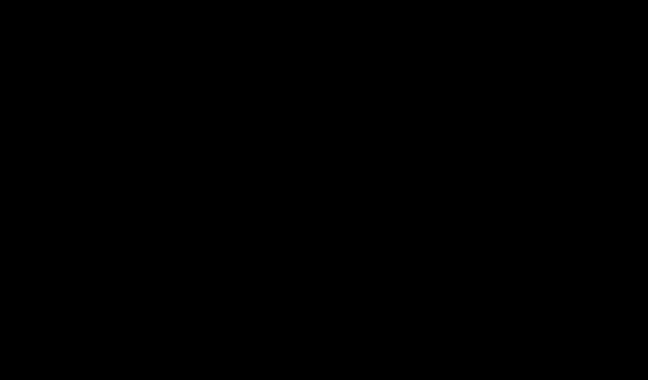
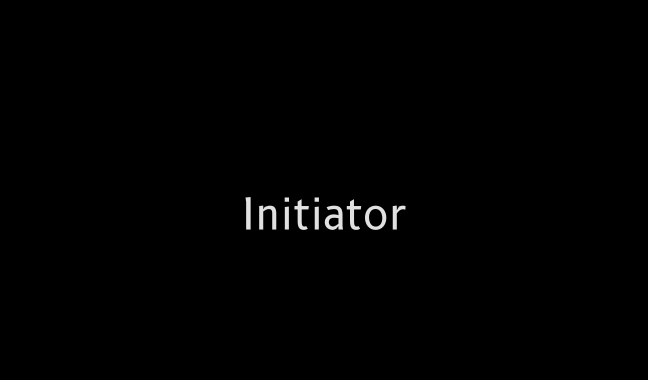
text: none -> Initiator (325, 213)

